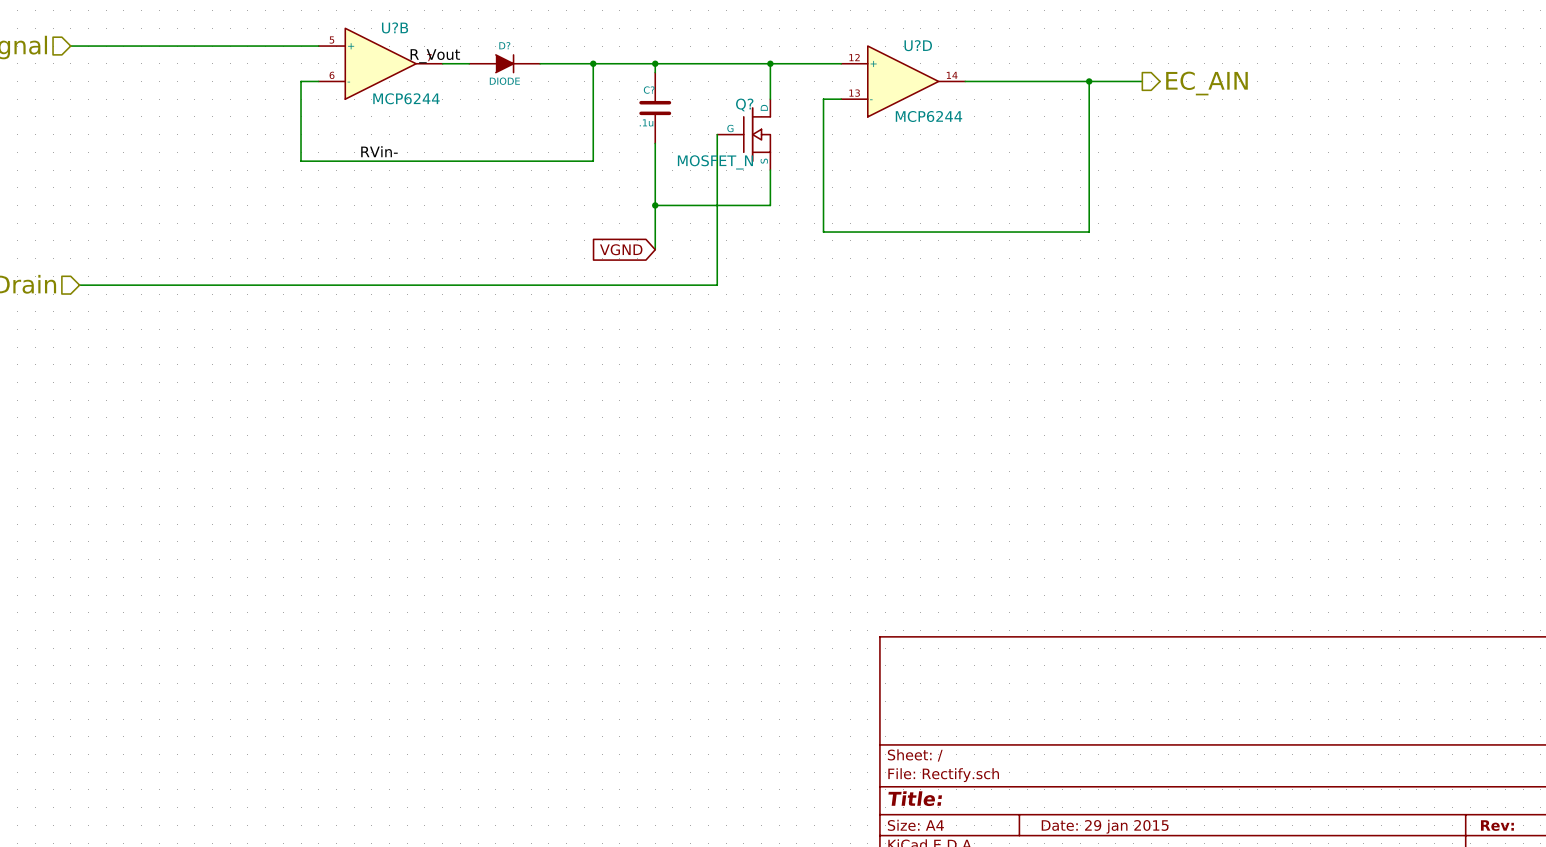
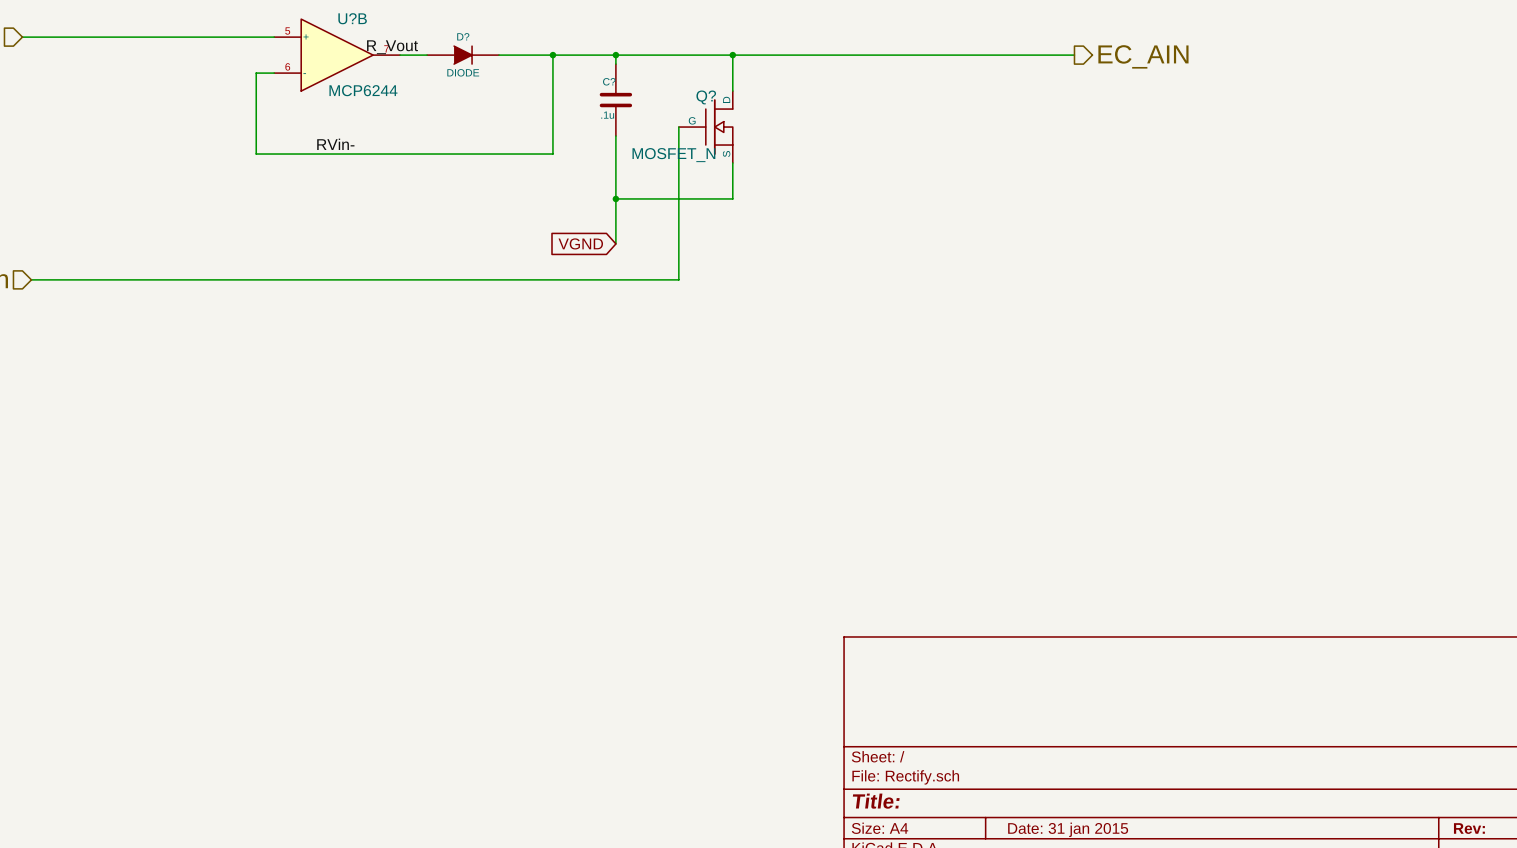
wire: none -> (804, 55) (1074, 55)
U?D: MCP6244 (903, 81) -> none
wire: (965, 81) (1142, 81) -> none
wire: (1089, 81) (1089, 232) (823, 232) (823, 99) (841, 99) -> none
junction: (1089, 81) -> none
hierarchical label position: EC_AIN (1206, 83) -> EC_AIN (1143, 56)
title block: Date: 29 jan 2015 (1105, 826) -> Date: 31 jan 2015 (1068, 829)

